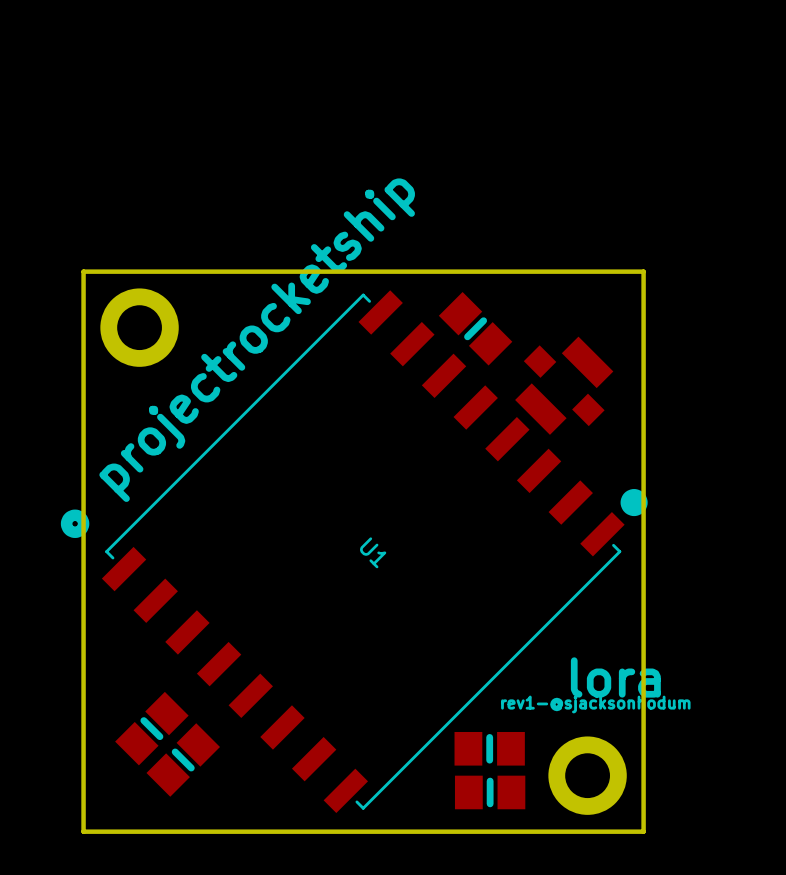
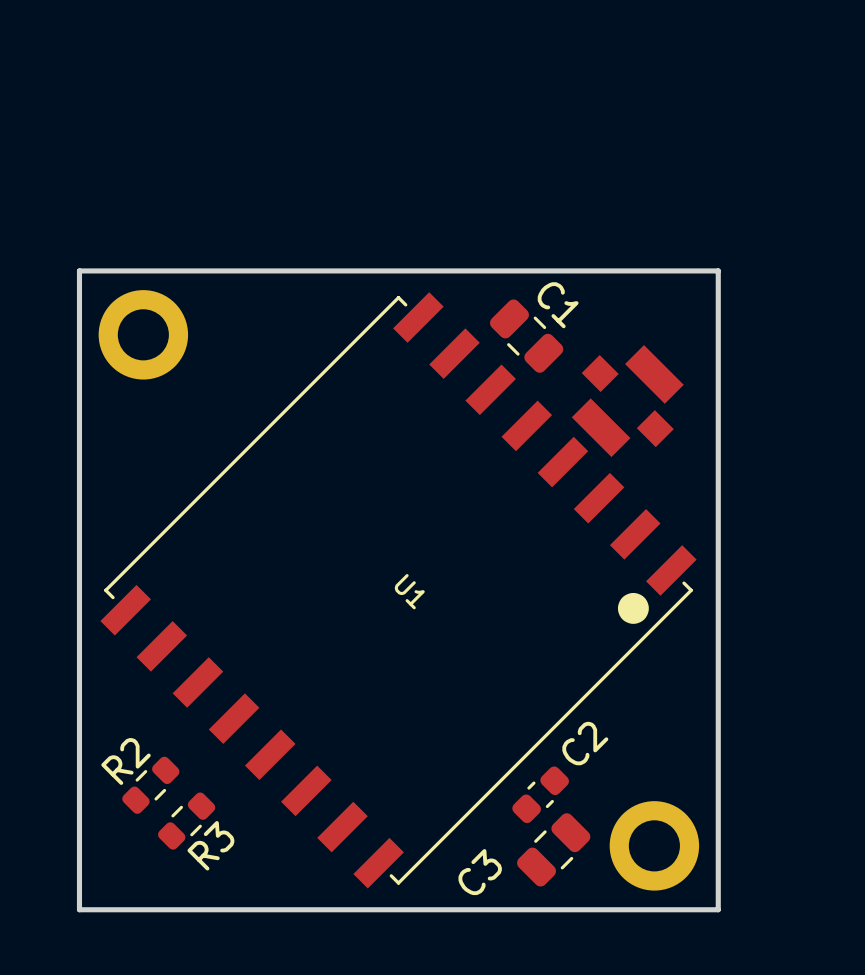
U1 footprint: [101, 290, 648, 814] -> [100, 292, 697, 889]
part: (475, 328) -> none
C1: none -> (526, 336)
text: projectrocketship (257, 340) -> none
part: (75, 523) -> none
text: lora (615, 677) -> none
text: rev1-@sjacksonhodum (595, 704) -> none
R2: none -> (150, 785)
part: (151, 728) -> none
C2: none -> (540, 794)
part: (489, 748) -> none
R3: none -> (186, 821)
part: (183, 759) -> none
C3: none -> (553, 849)
part: (490, 792) -> none

